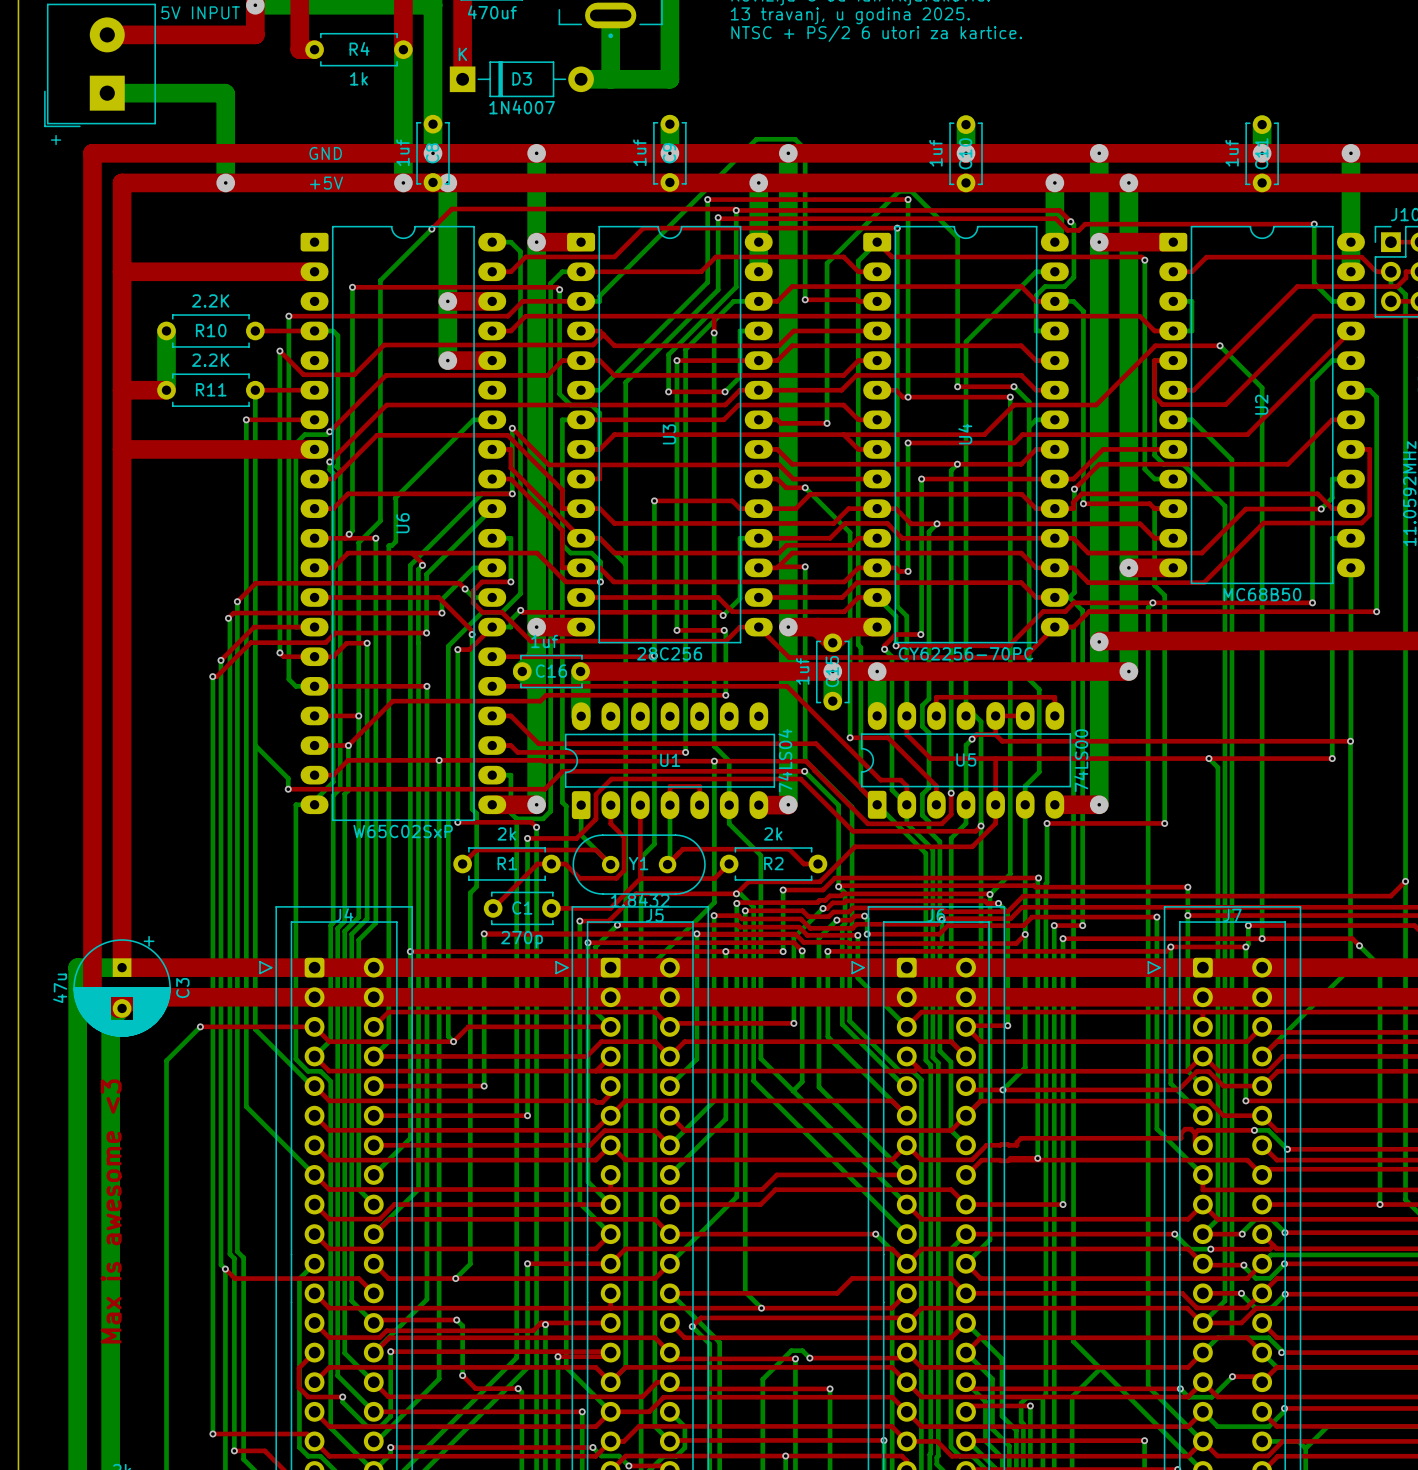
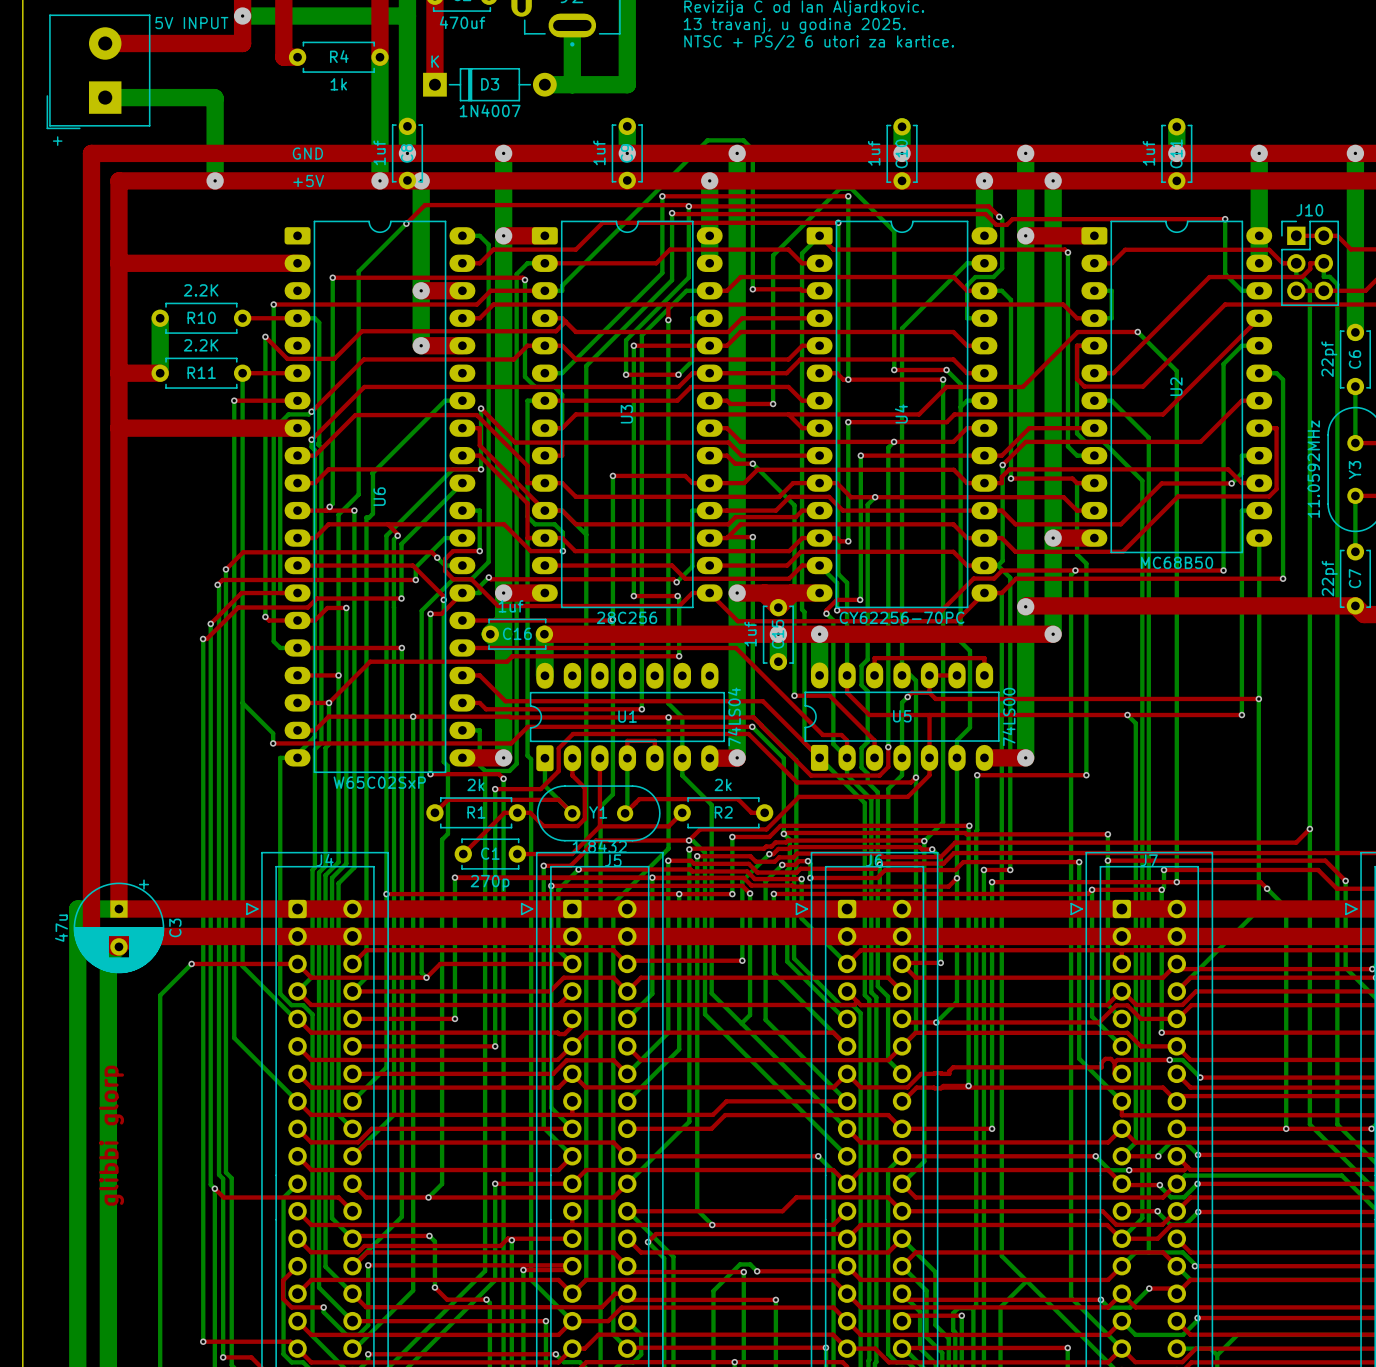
text: Max is awesome <3 (111, 1211) -> glibbi glorp (111, 1135)

